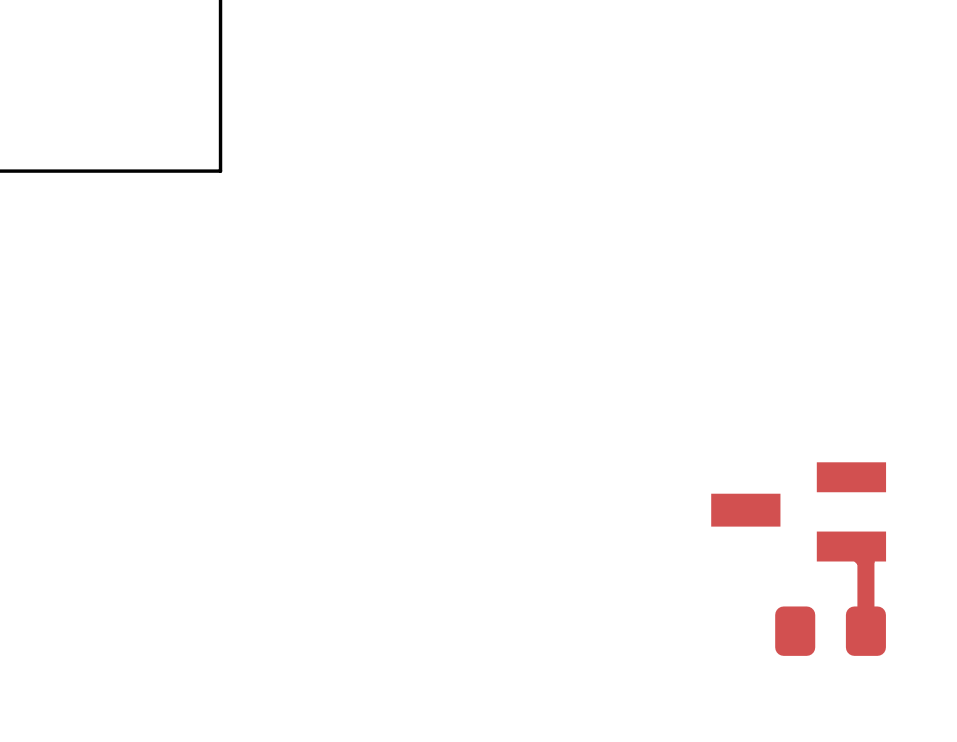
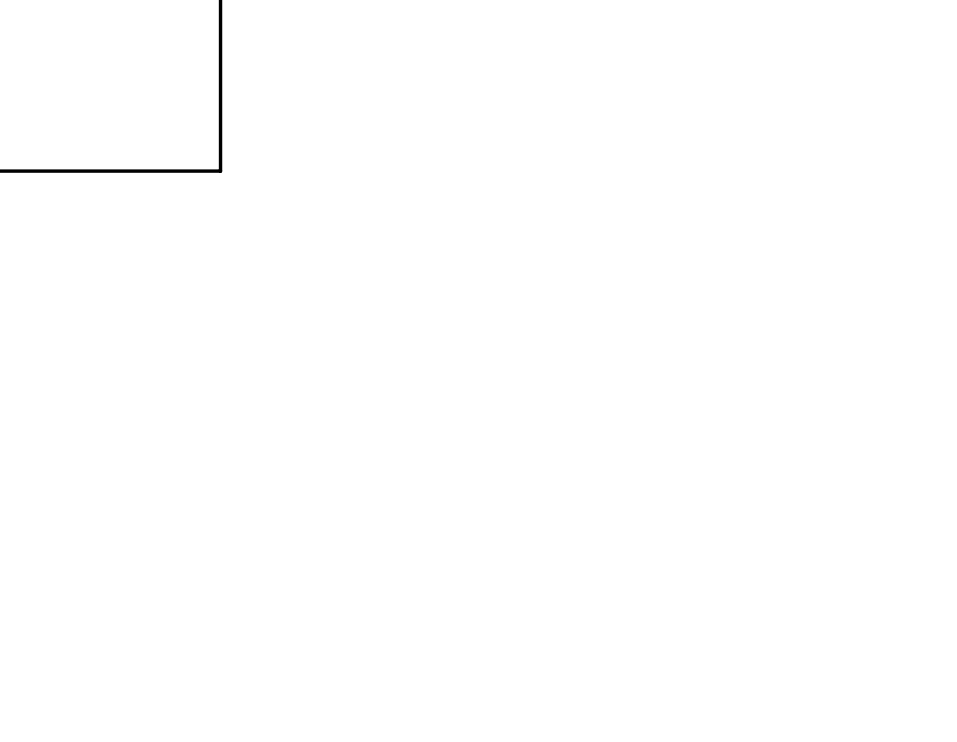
part: (798, 511) -> none
top track: (851, 546) (865, 561) (865, 631) -> none
part: (830, 631) -> none

